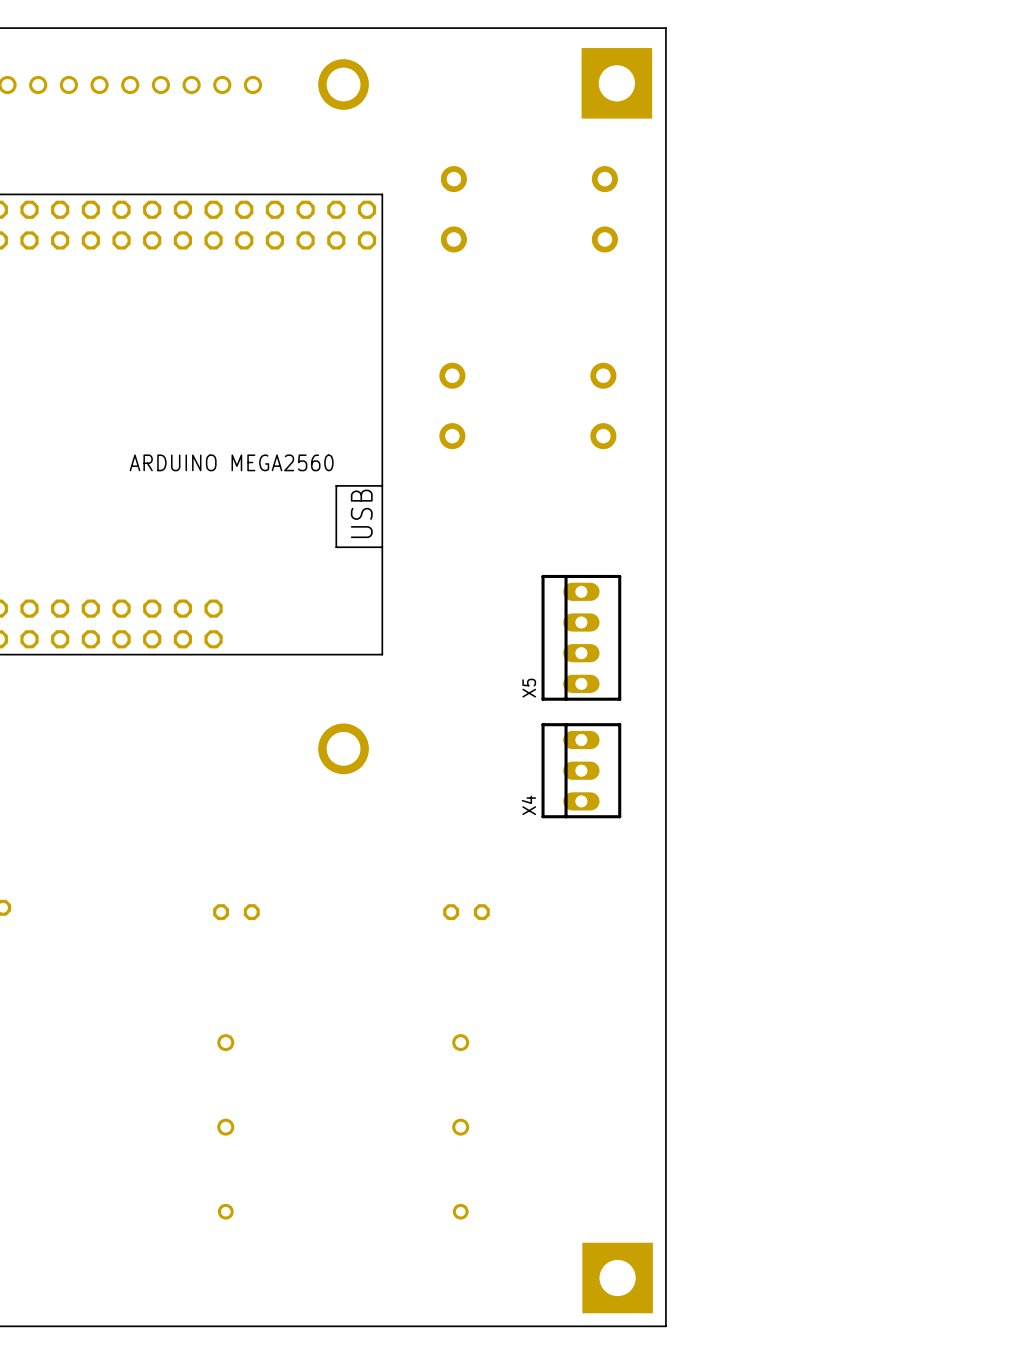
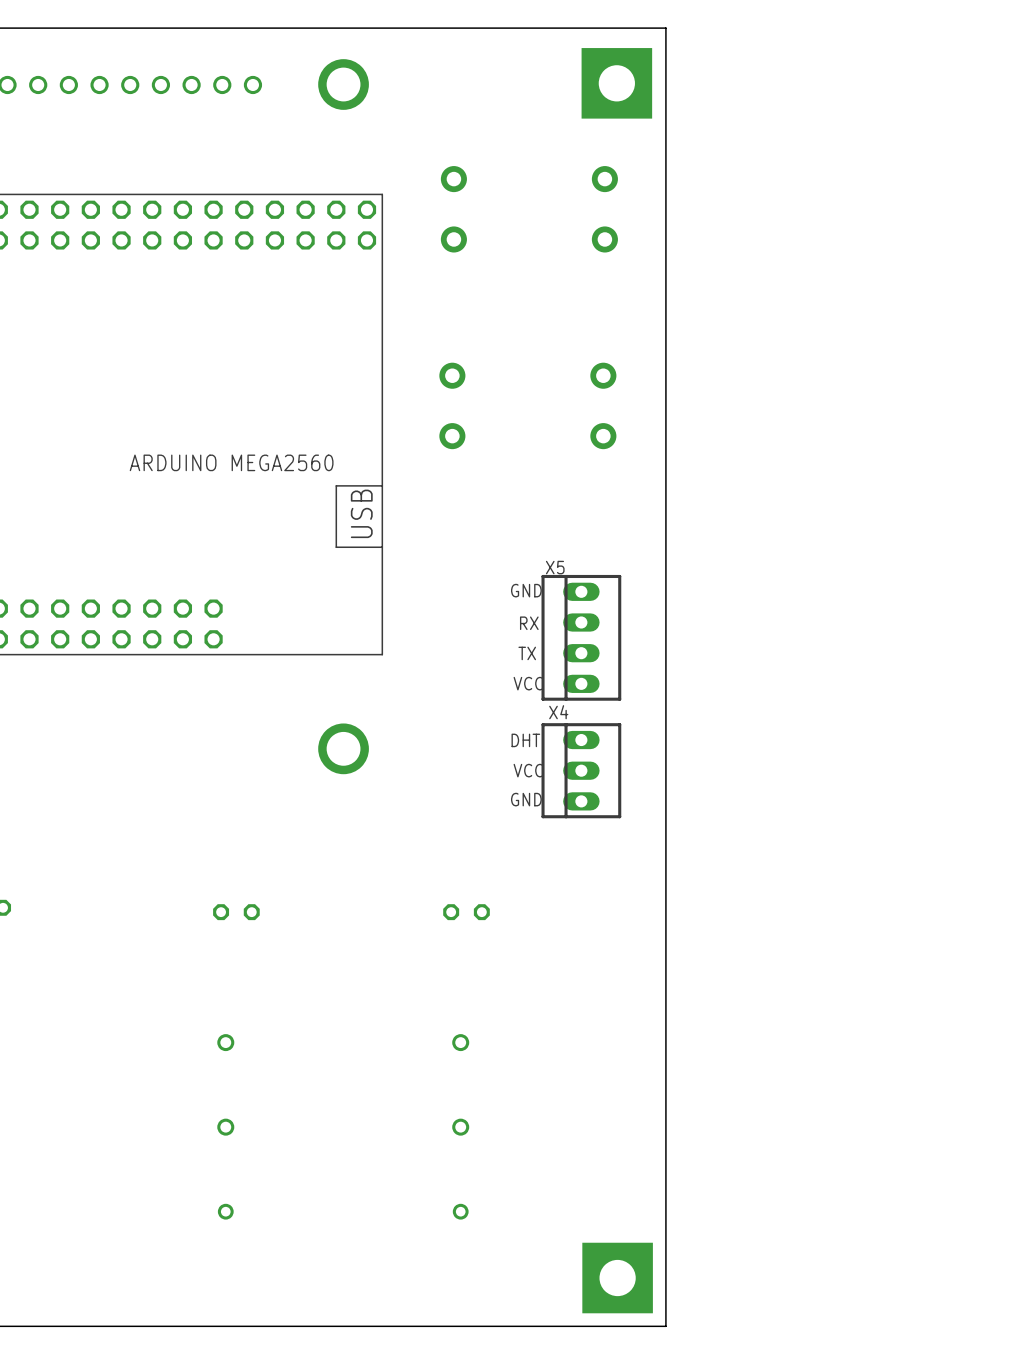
text: none -> GND (526, 590)
text: none -> RX (529, 623)
text: none -> TX (527, 653)
text: none -> VCC (528, 683)
X5 name rotation: 0° (529, 688) -> 90° clockwise (555, 567)
X5 name position: X5 (529, 688) -> X5 (555, 567)
text: none -> DHT (525, 740)
text: none -> VCC (528, 770)
text: none -> GND (526, 799)
X4 name rotation: 0° (528, 805) -> 90° clockwise (558, 712)
X4 name position: X4 (528, 805) -> X4 (558, 712)

